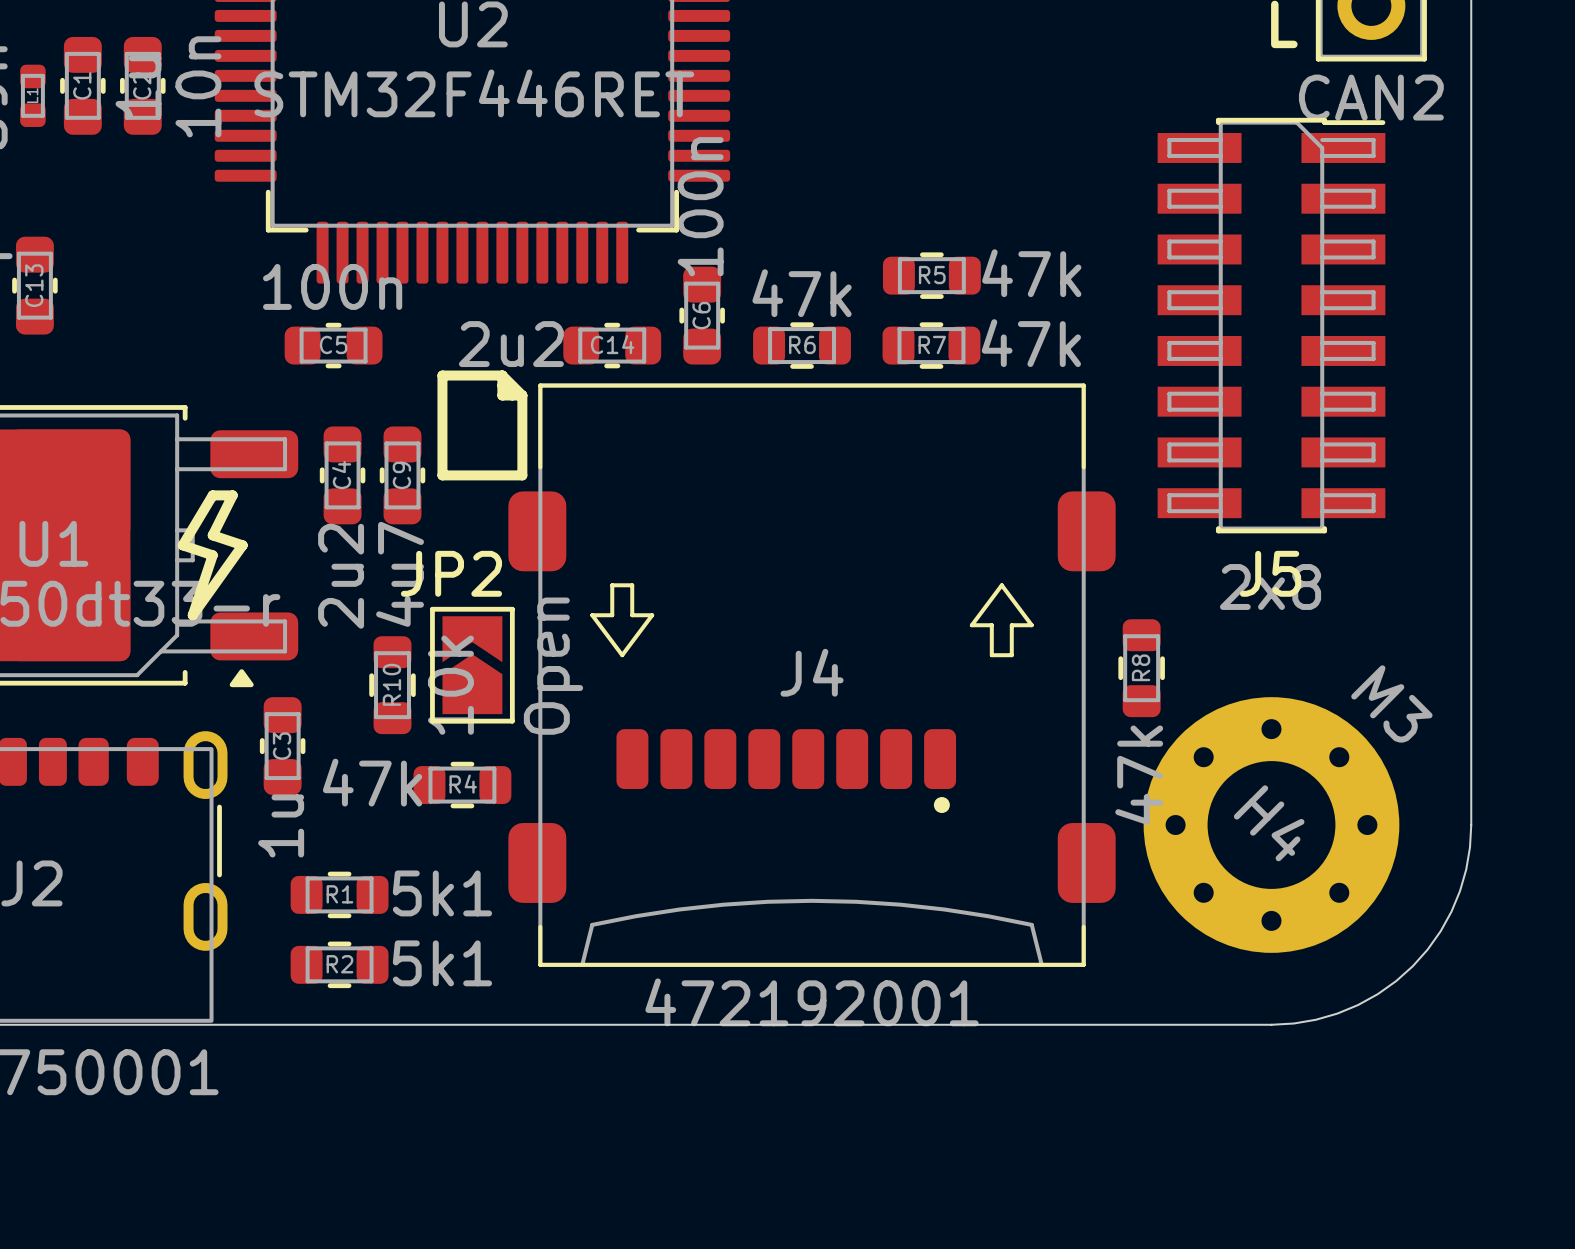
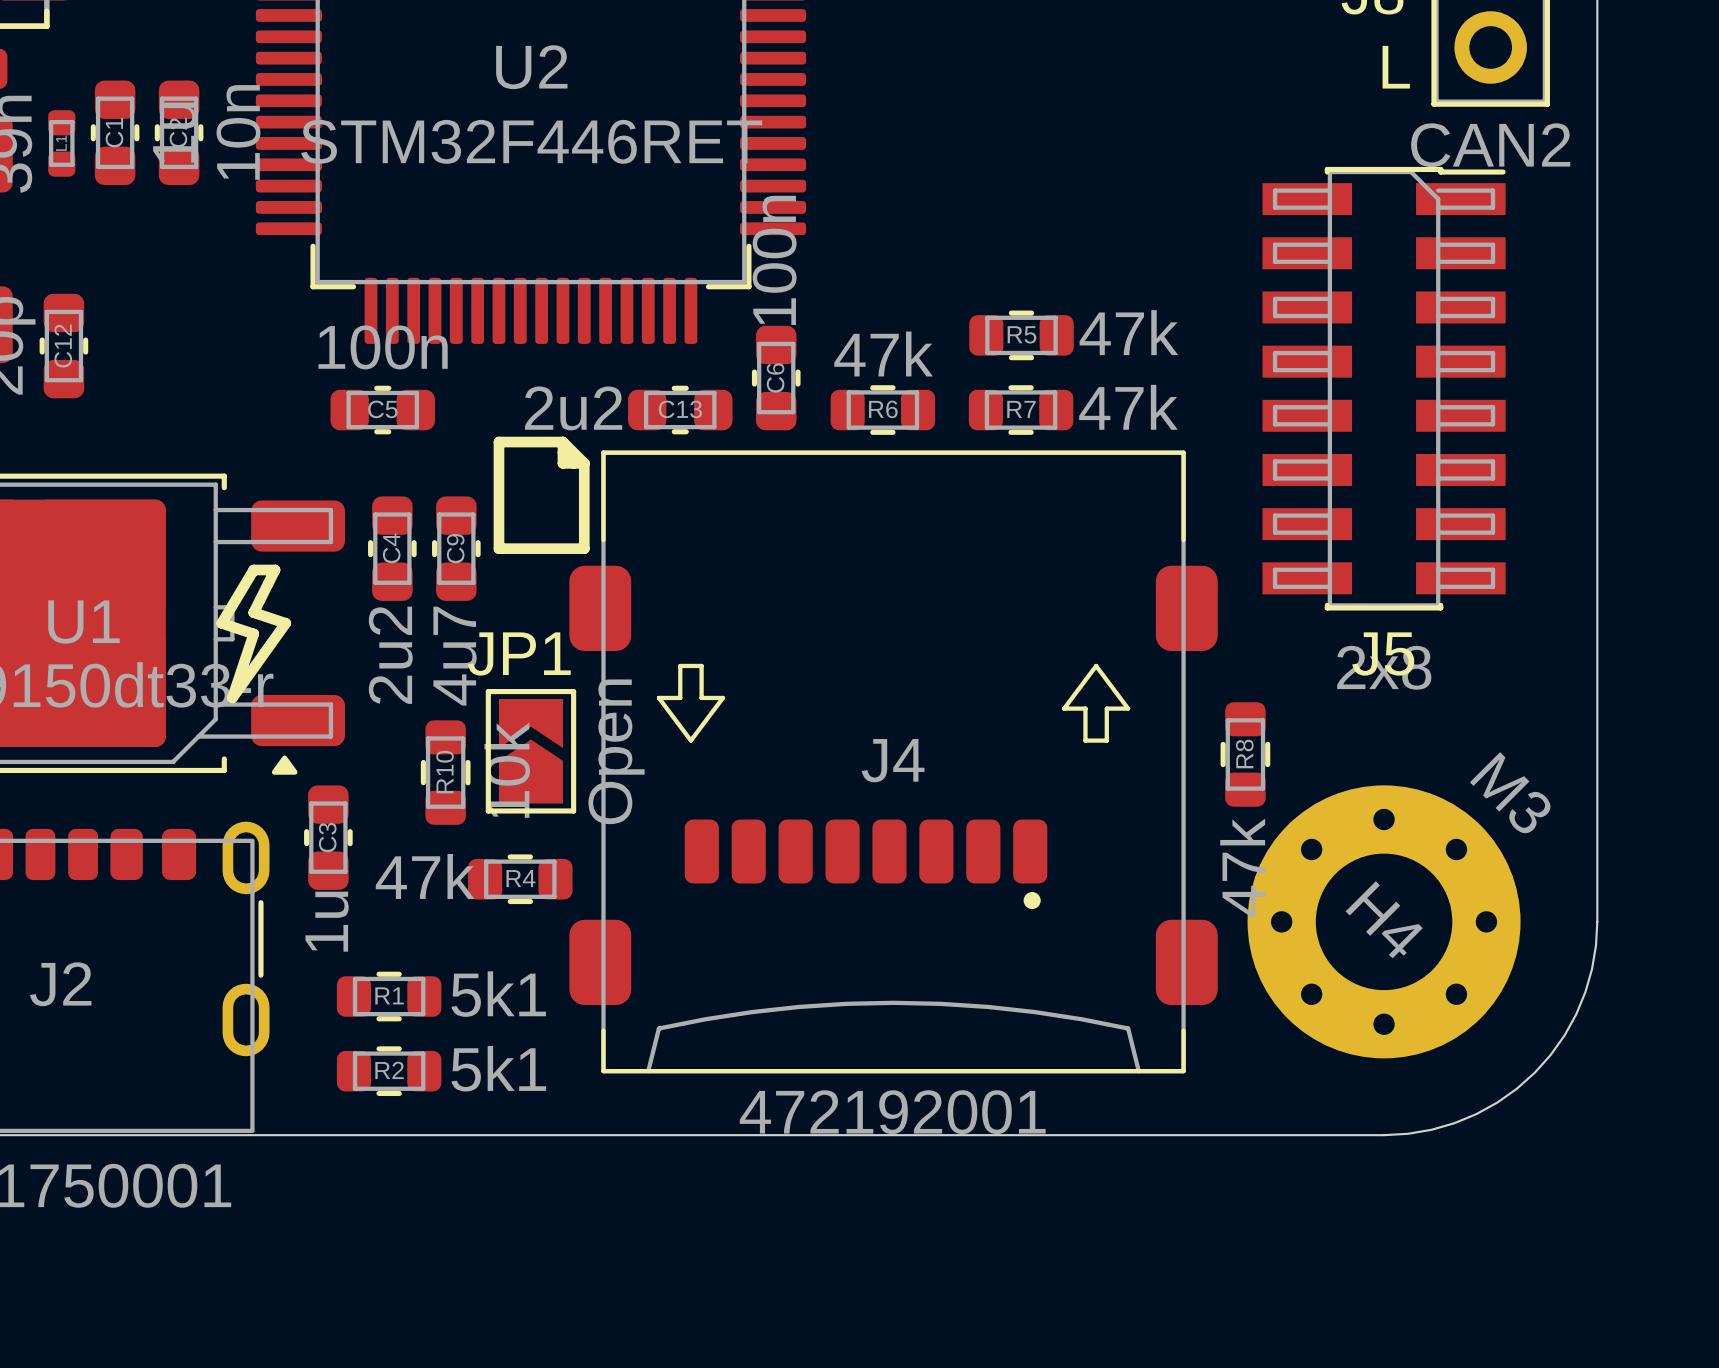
C13 name: C13 (34, 285) -> C12 (63, 346)
C14 name: C14 (612, 344) -> C13 (680, 409)
JP2 name: JP2 (451, 573) -> JP1 (519, 654)

